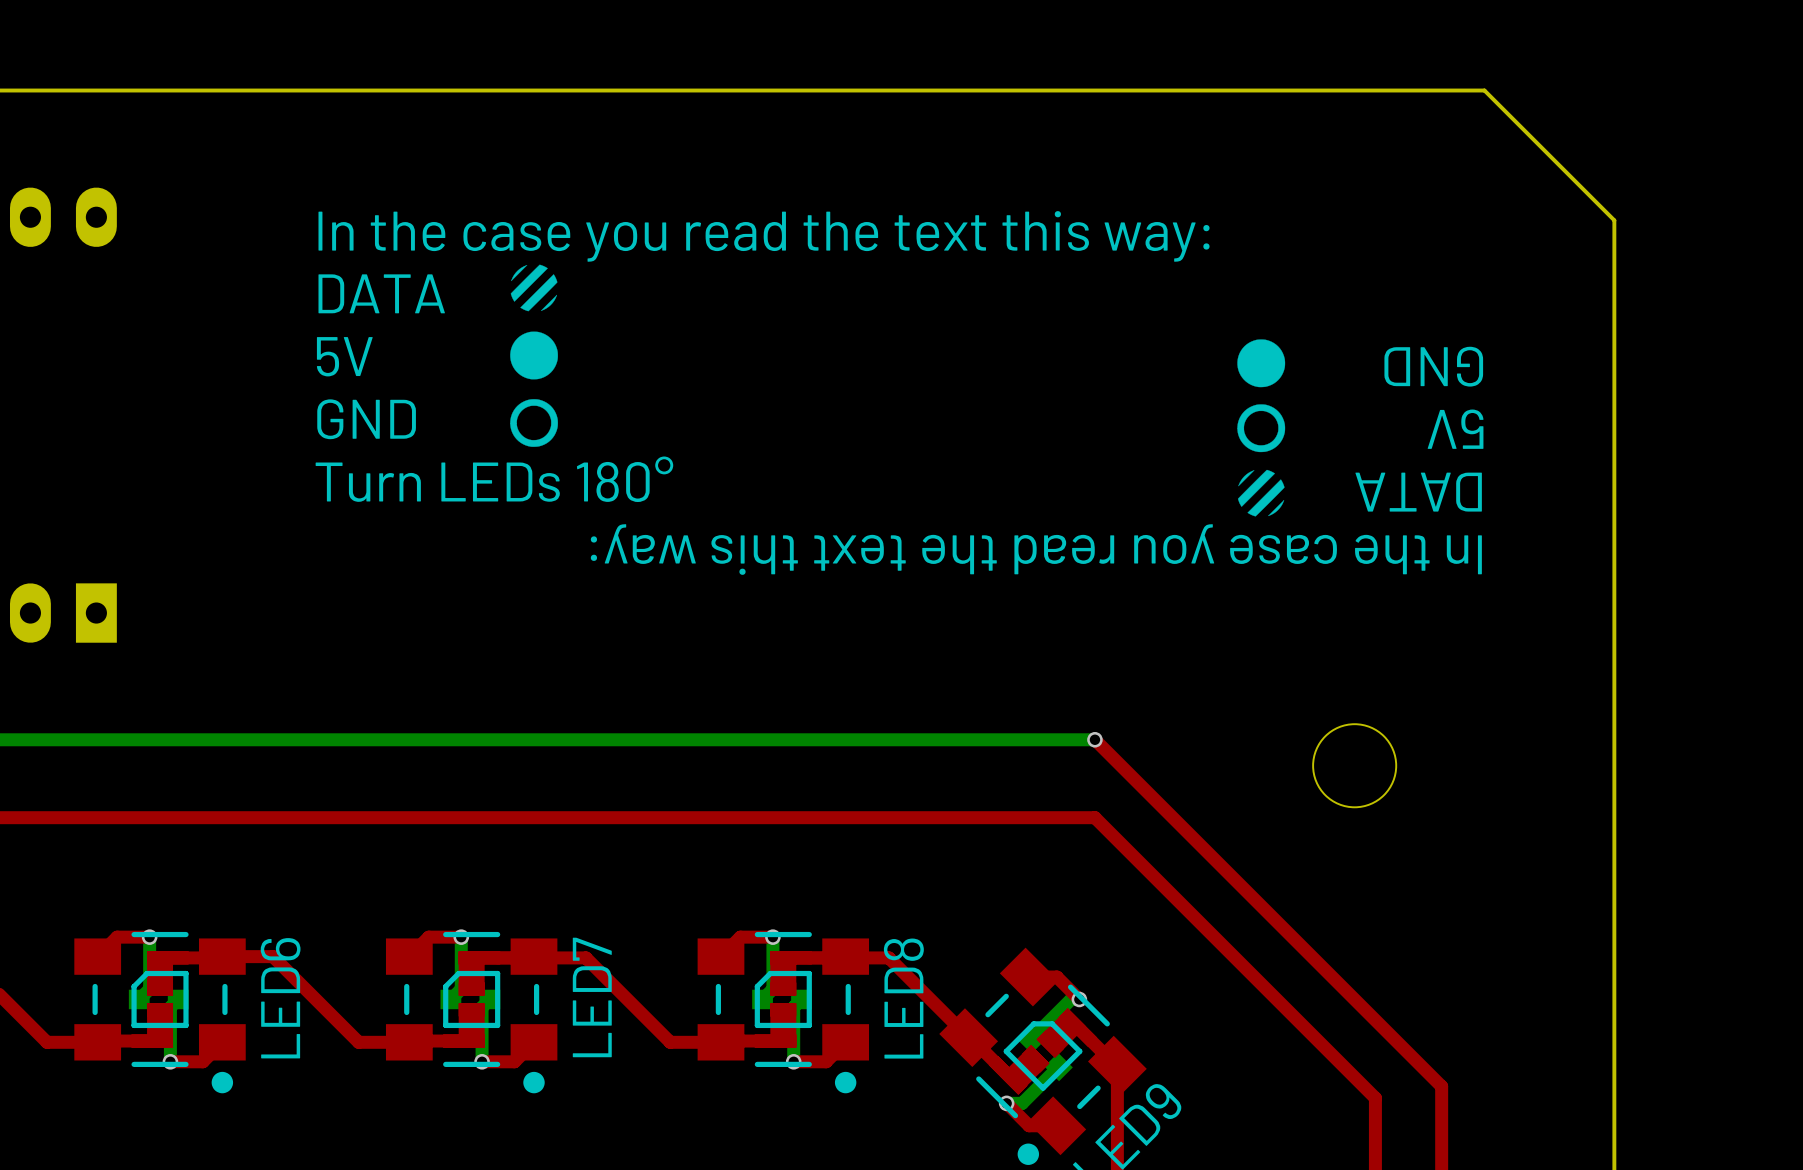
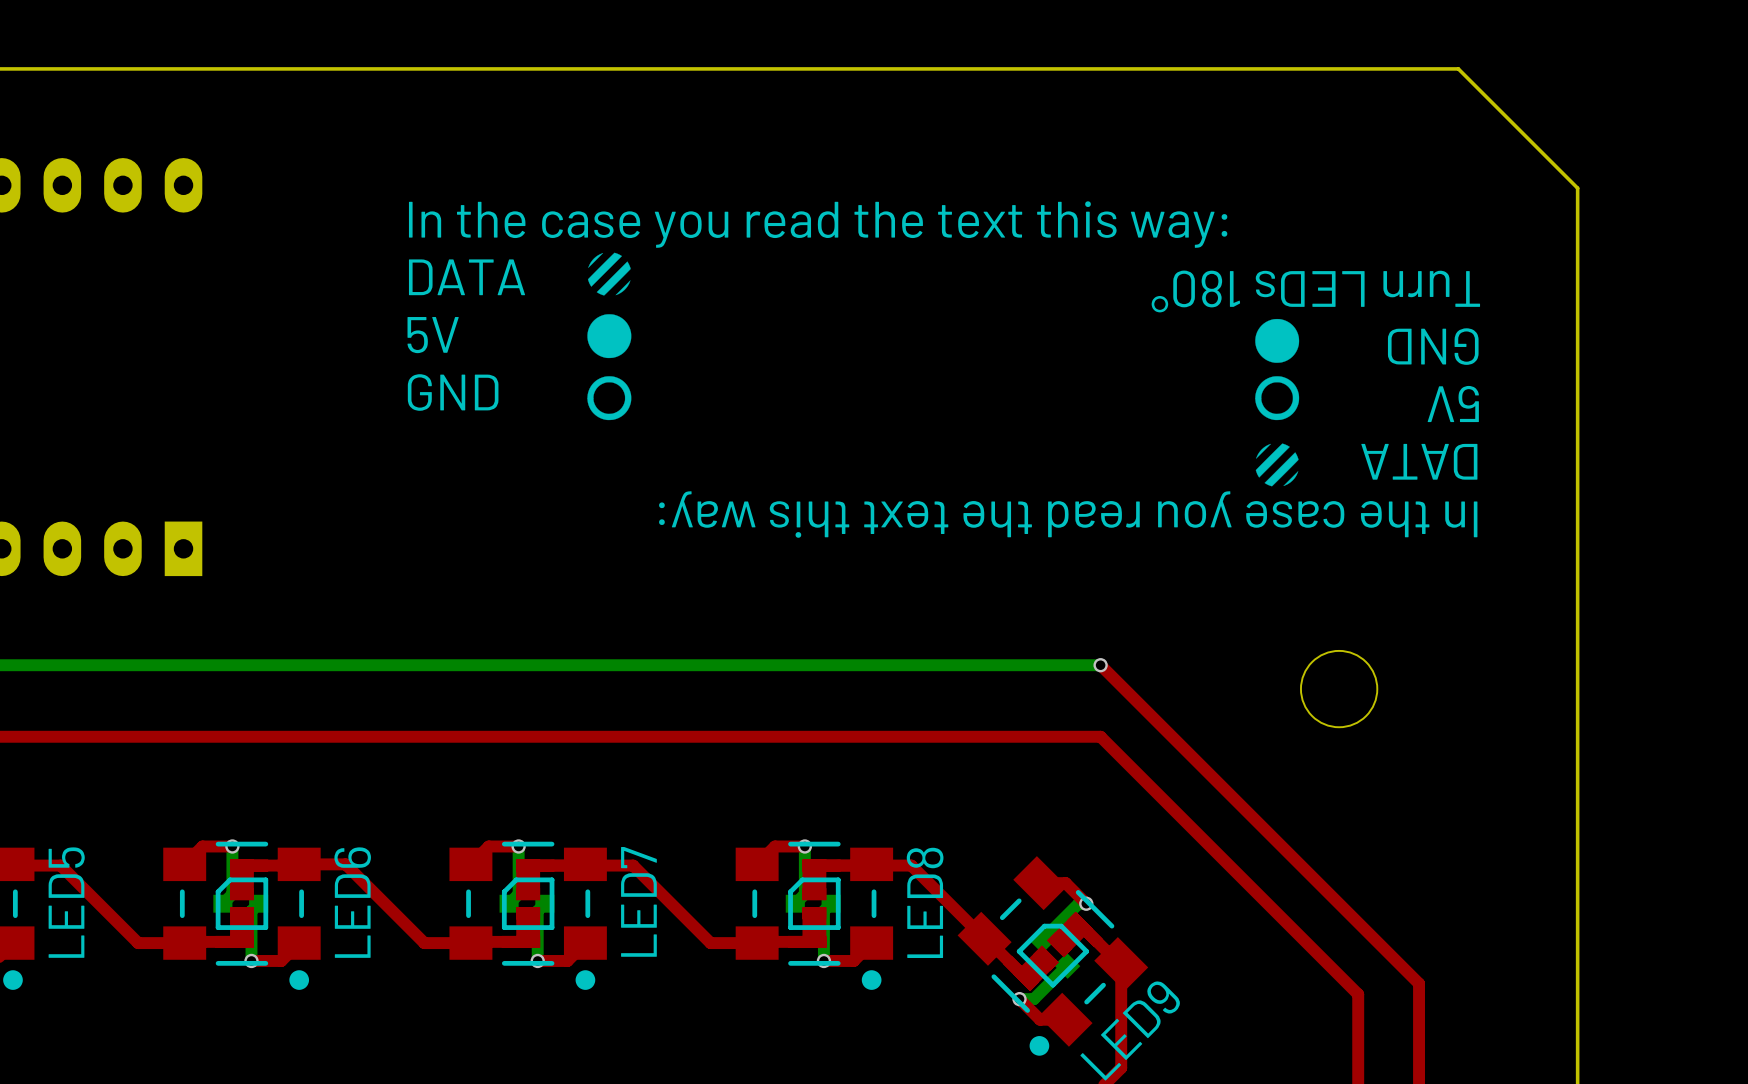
text position: In the case you read the text this way: (764, 236) -> In the case you read the text this way: (818, 224)
drawing position: (534, 287) -> (609, 274)
text position: DATA (381, 293) -> DATA (467, 277)
text: none -> Turn LEDs 180° (1315, 291)
drawing position: (534, 355) -> (609, 336)
text position: 5V (344, 356) -> 5V (433, 335)
drawing position: (1261, 363) -> (1277, 340)
text position: GND (1433, 366) -> GND (1433, 346)
text position: GND (366, 419) -> GND (453, 392)
drawing position: (534, 423) -> (609, 398)
drawing position: (1261, 428) -> (1277, 398)
text position: 5V (1455, 429) -> 5V (1453, 404)
text: Turn LEDs 180° (494, 479) -> none
text position: DATA (1418, 492) -> DATA (1419, 461)
drawing position: (1261, 493) -> (1277, 464)
text position: In the case you read the text this way: (1036, 549) -> In the case you read the text this way: (1068, 514)

